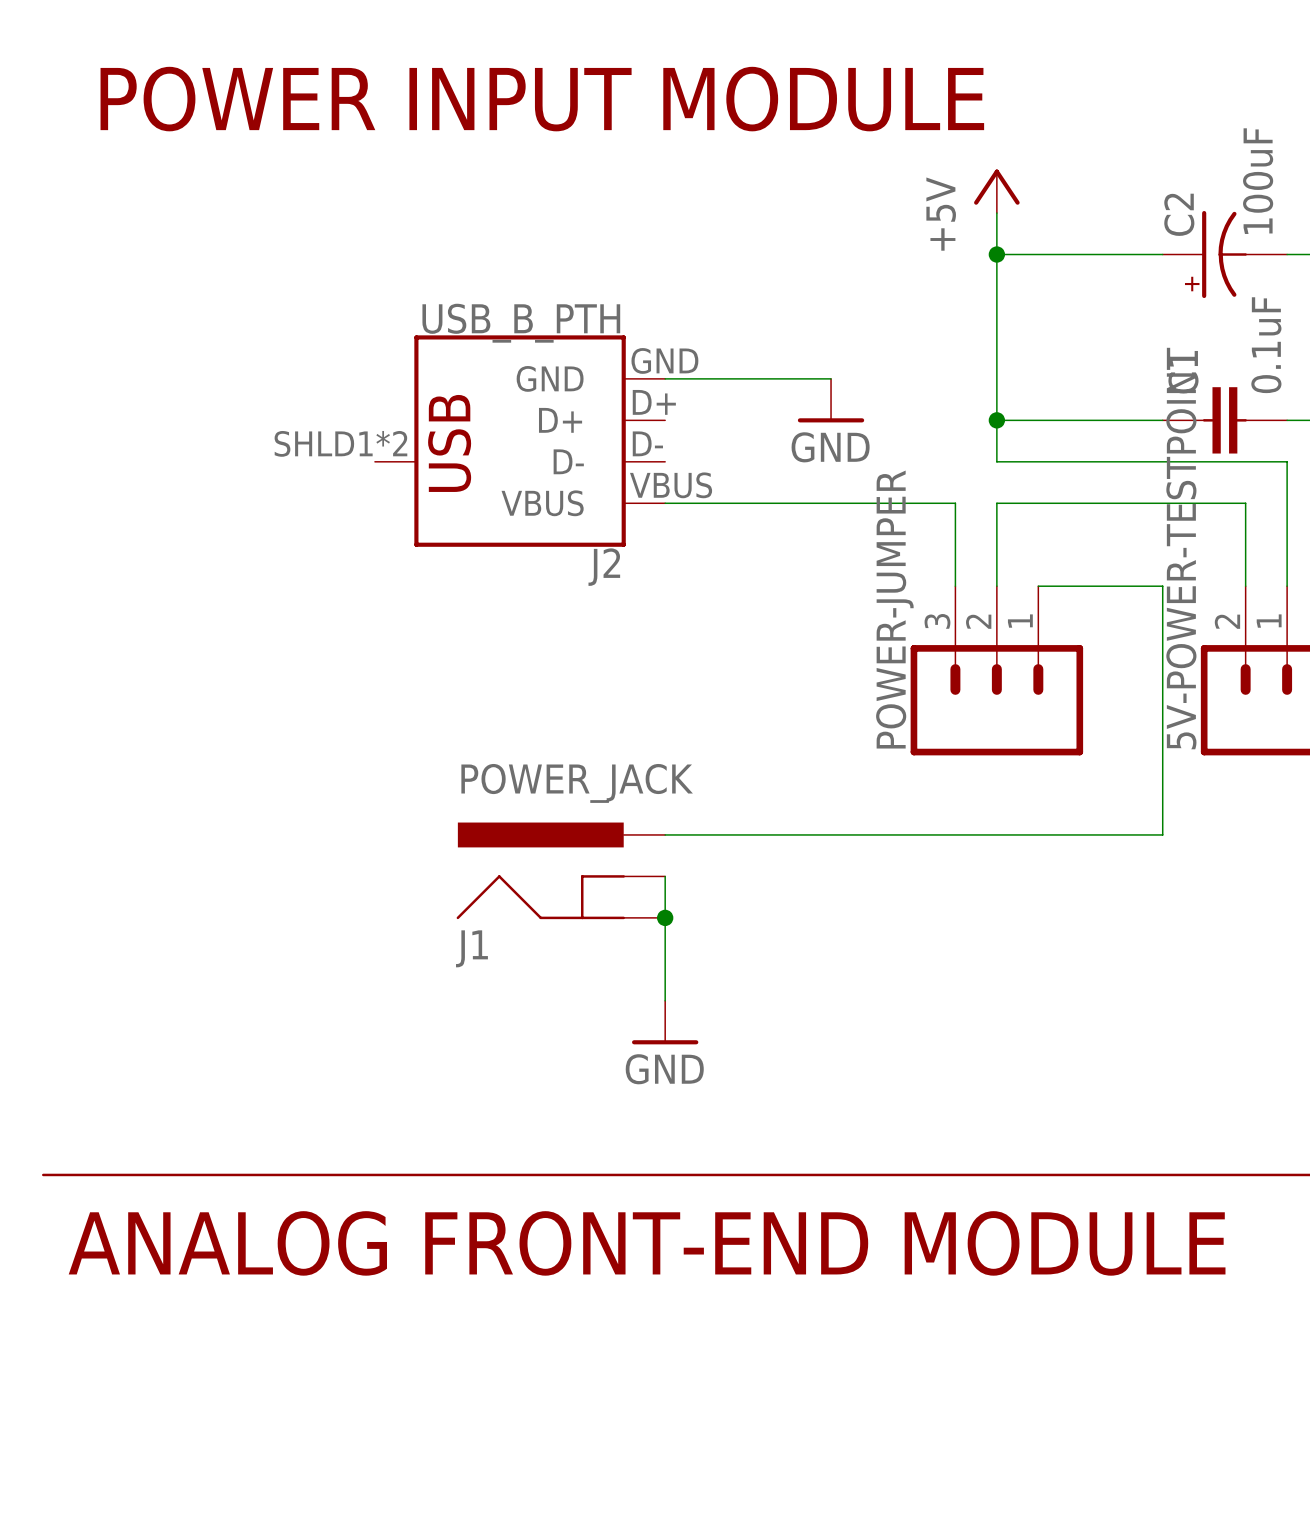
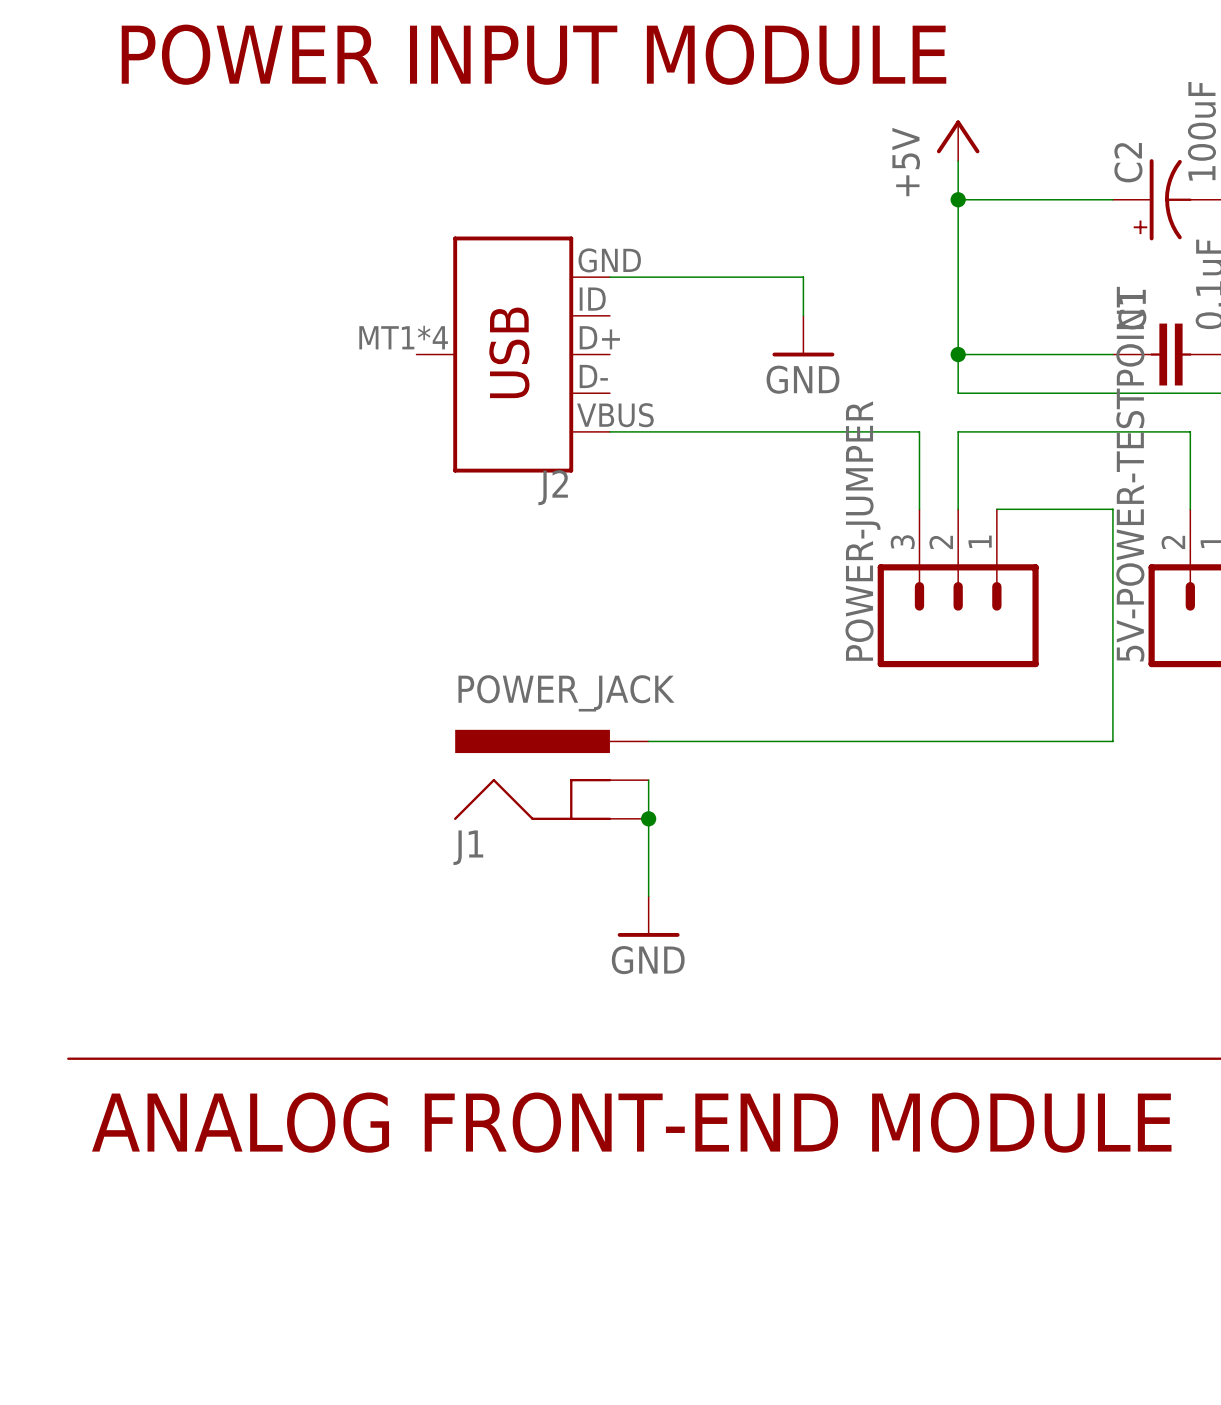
J2 value: USB_B_PTH (521, 323) -> none
J2 symbol: [374, 335, 666, 547] -> [416, 236, 610, 473]
wire: (665, 378) (831, 378) -> (609, 277) (803, 277) (803, 315)
J2 name position: J2 (604, 567) -> J2 (553, 487)

